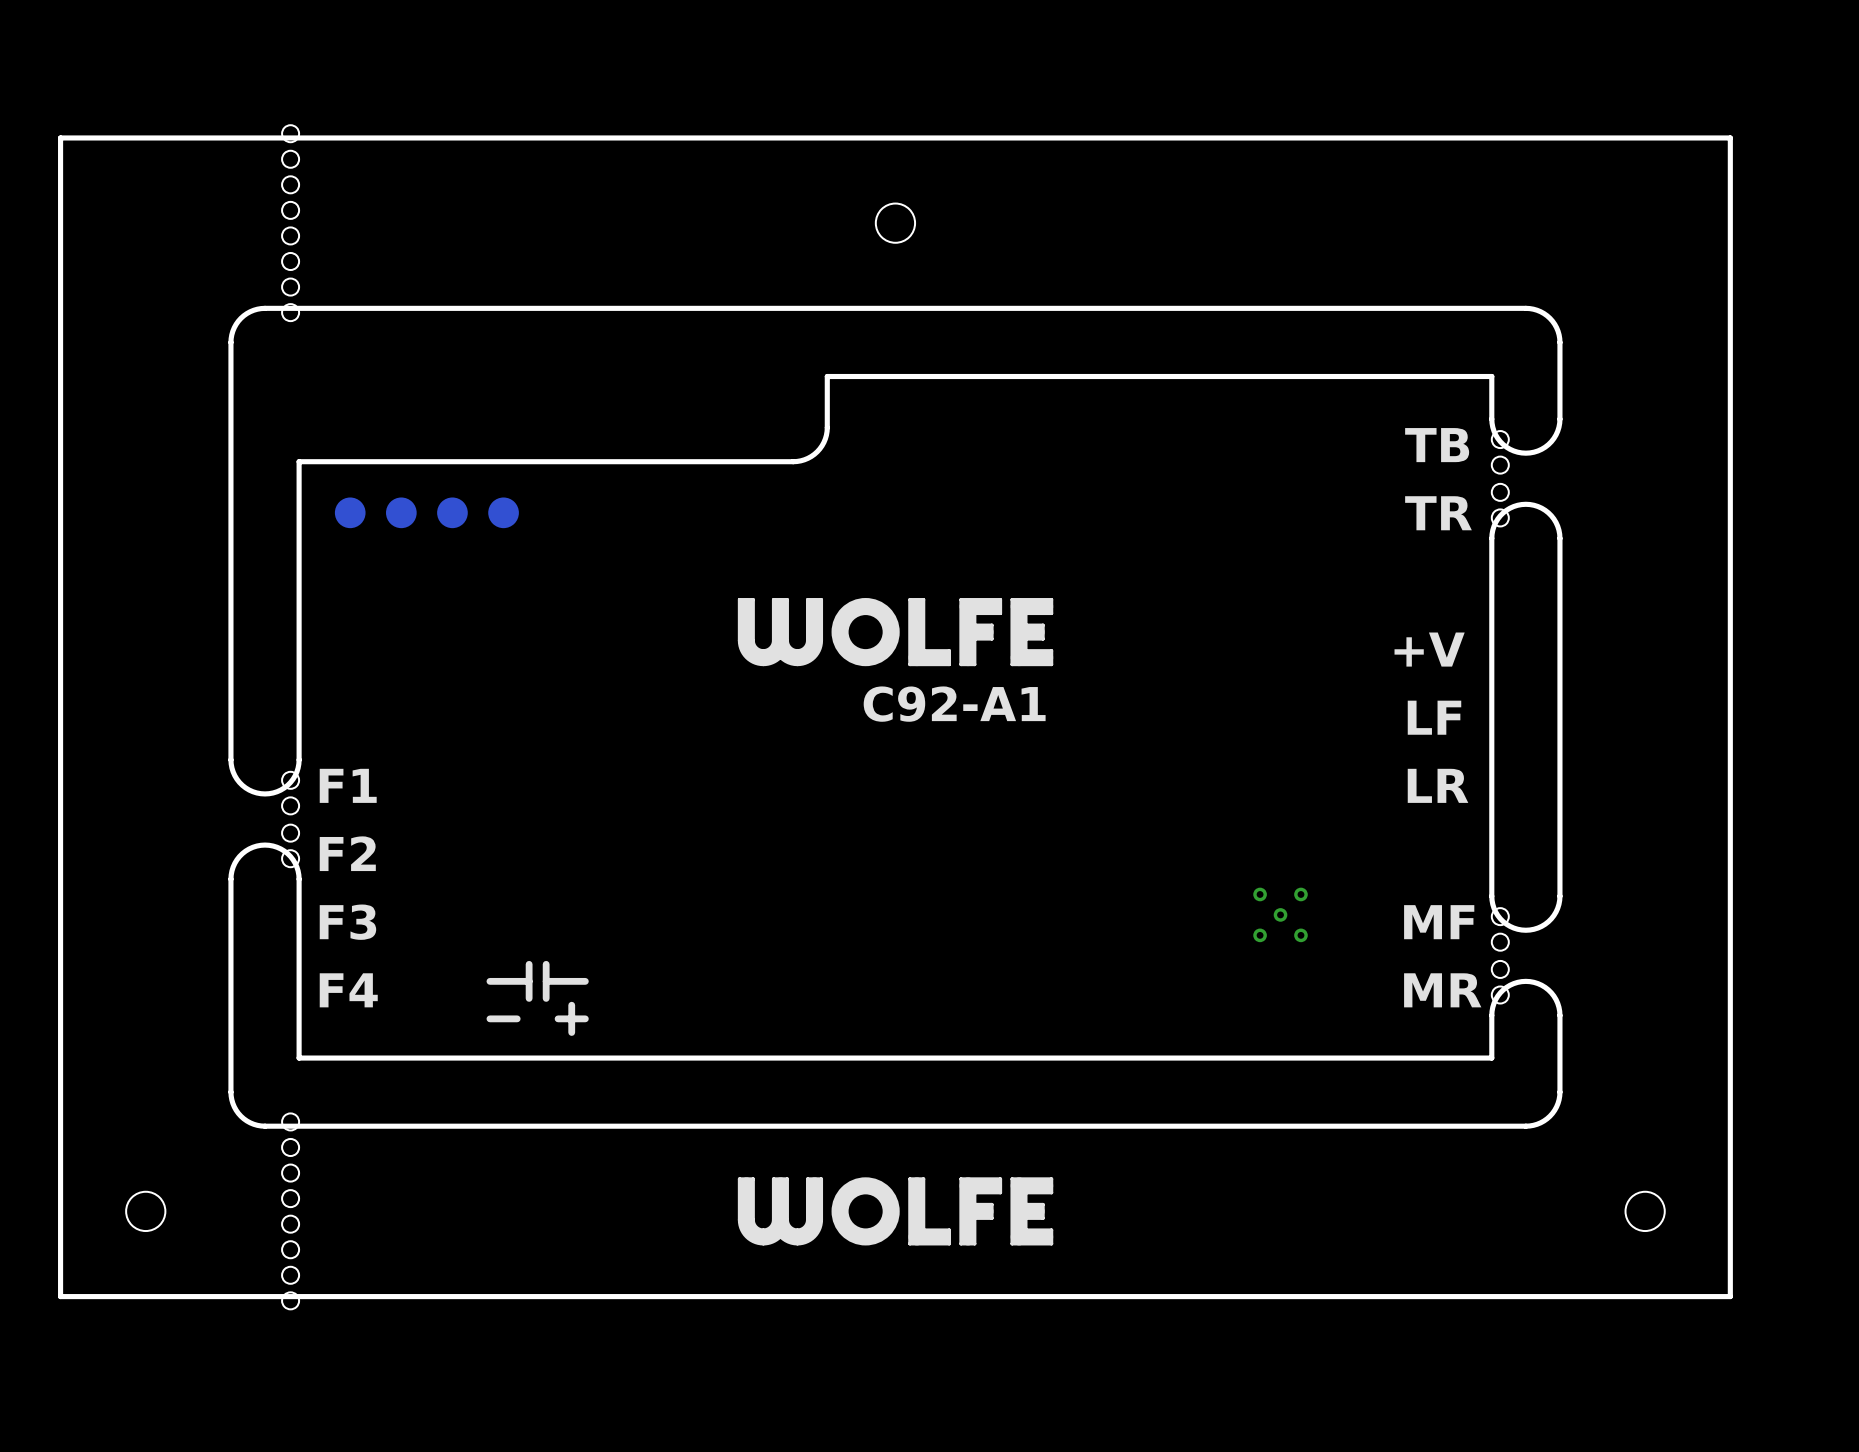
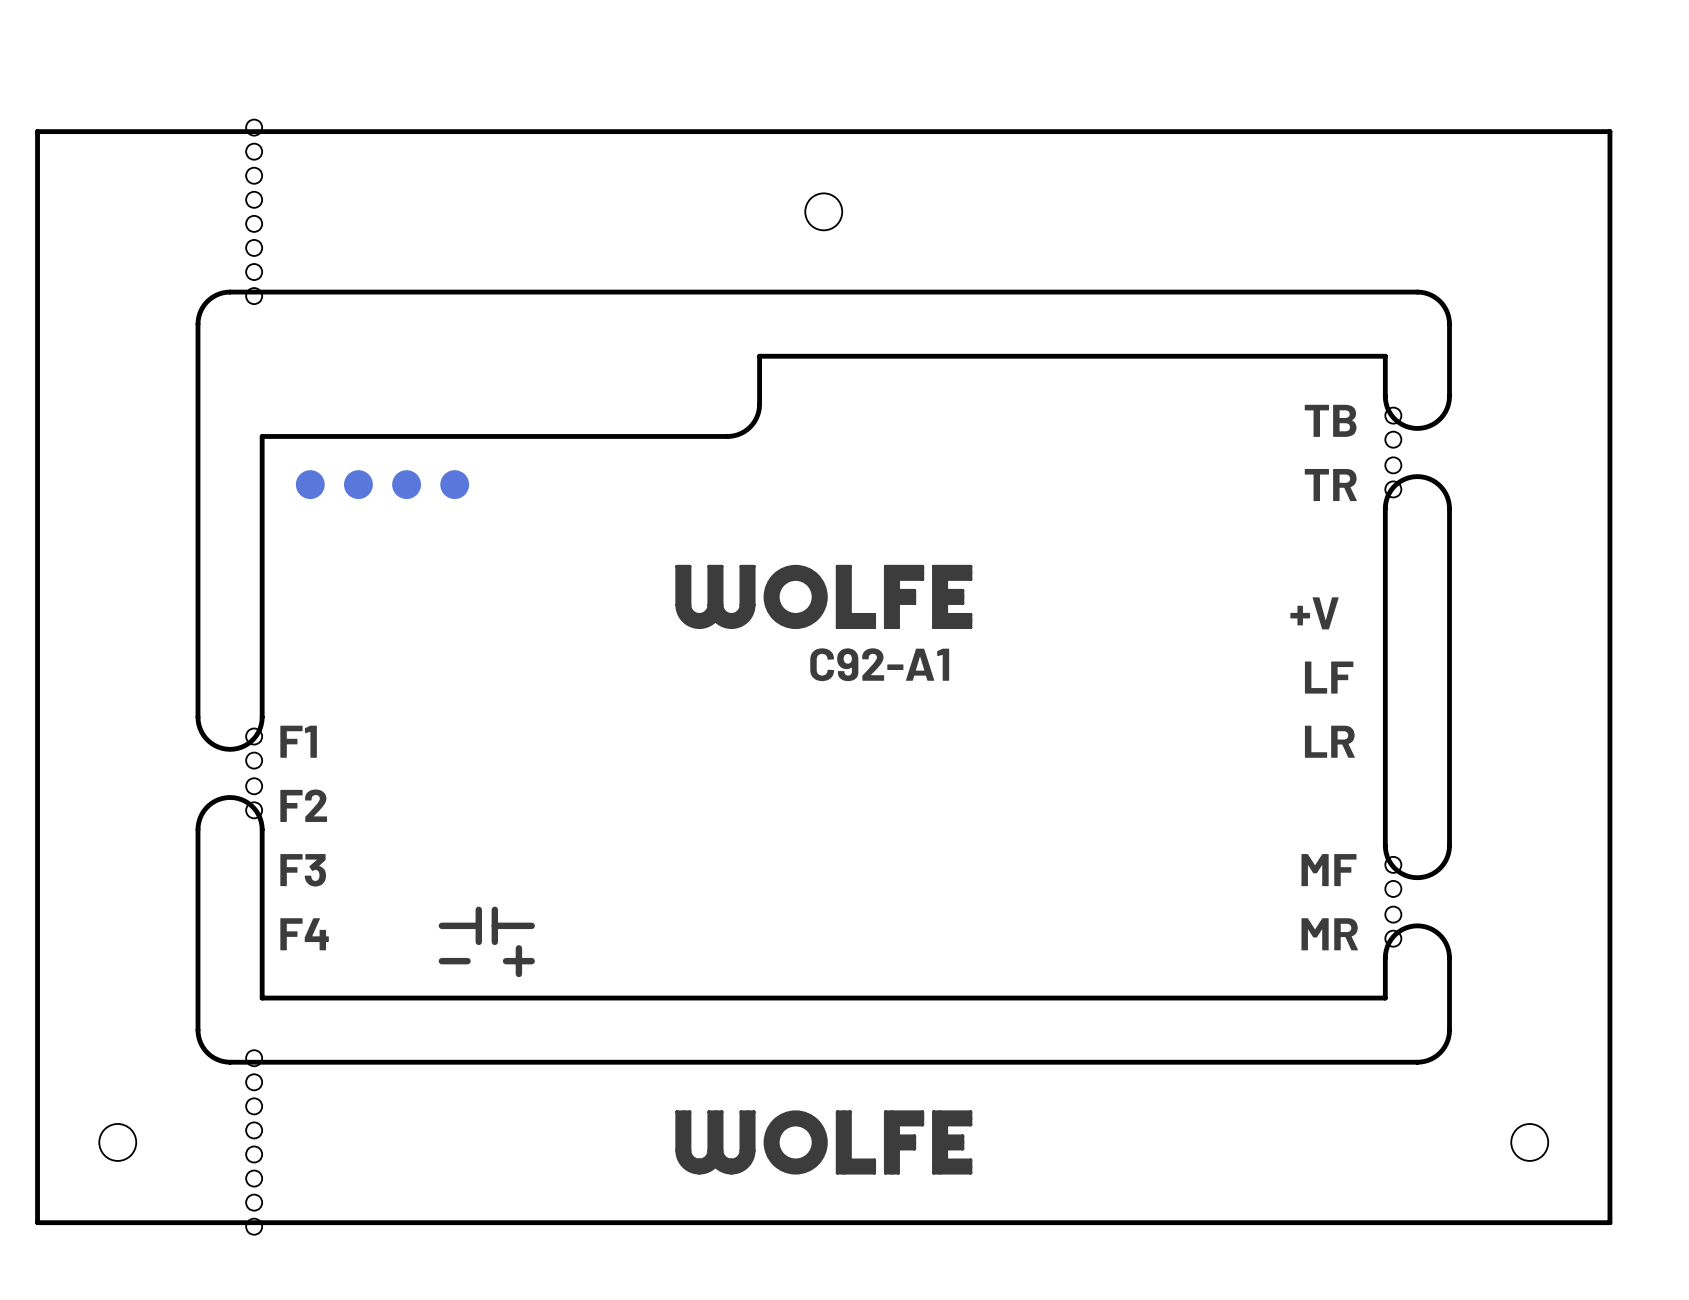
part: (1280, 914) -> none

